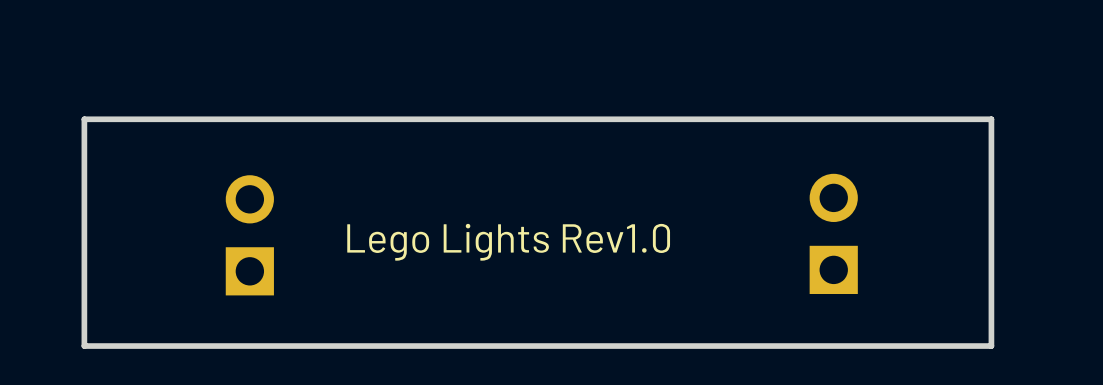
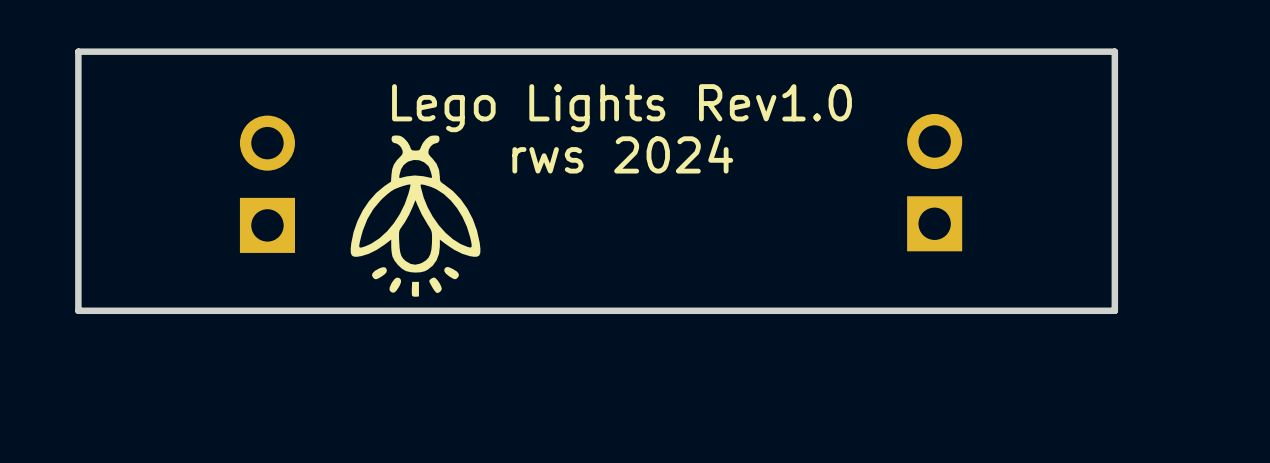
drawing: none -> [350, 135, 481, 297]
text: none -> rws 2024 (622, 154)
text position: Lego Lights Rev1.0 (508, 242) -> Lego Lights Rev1.0 (621, 108)

